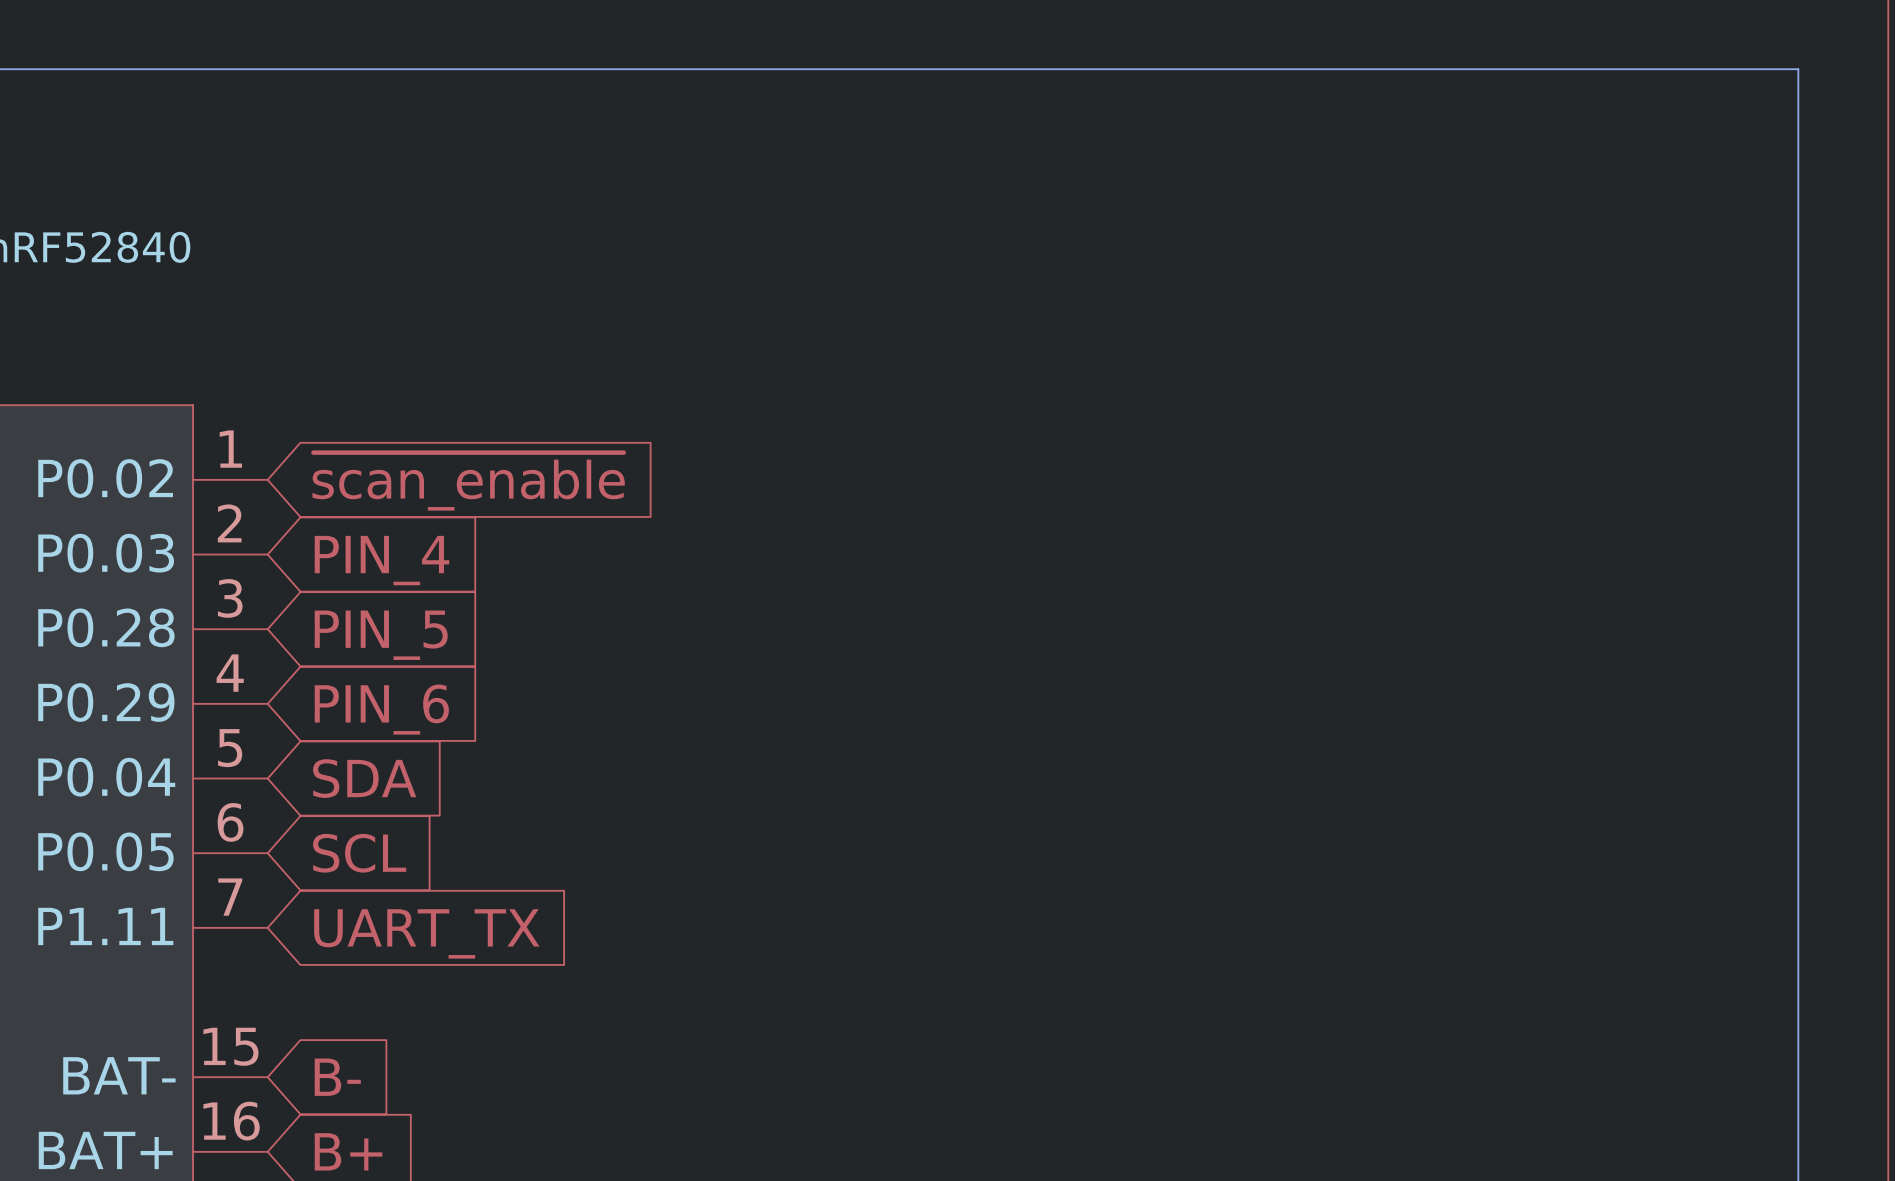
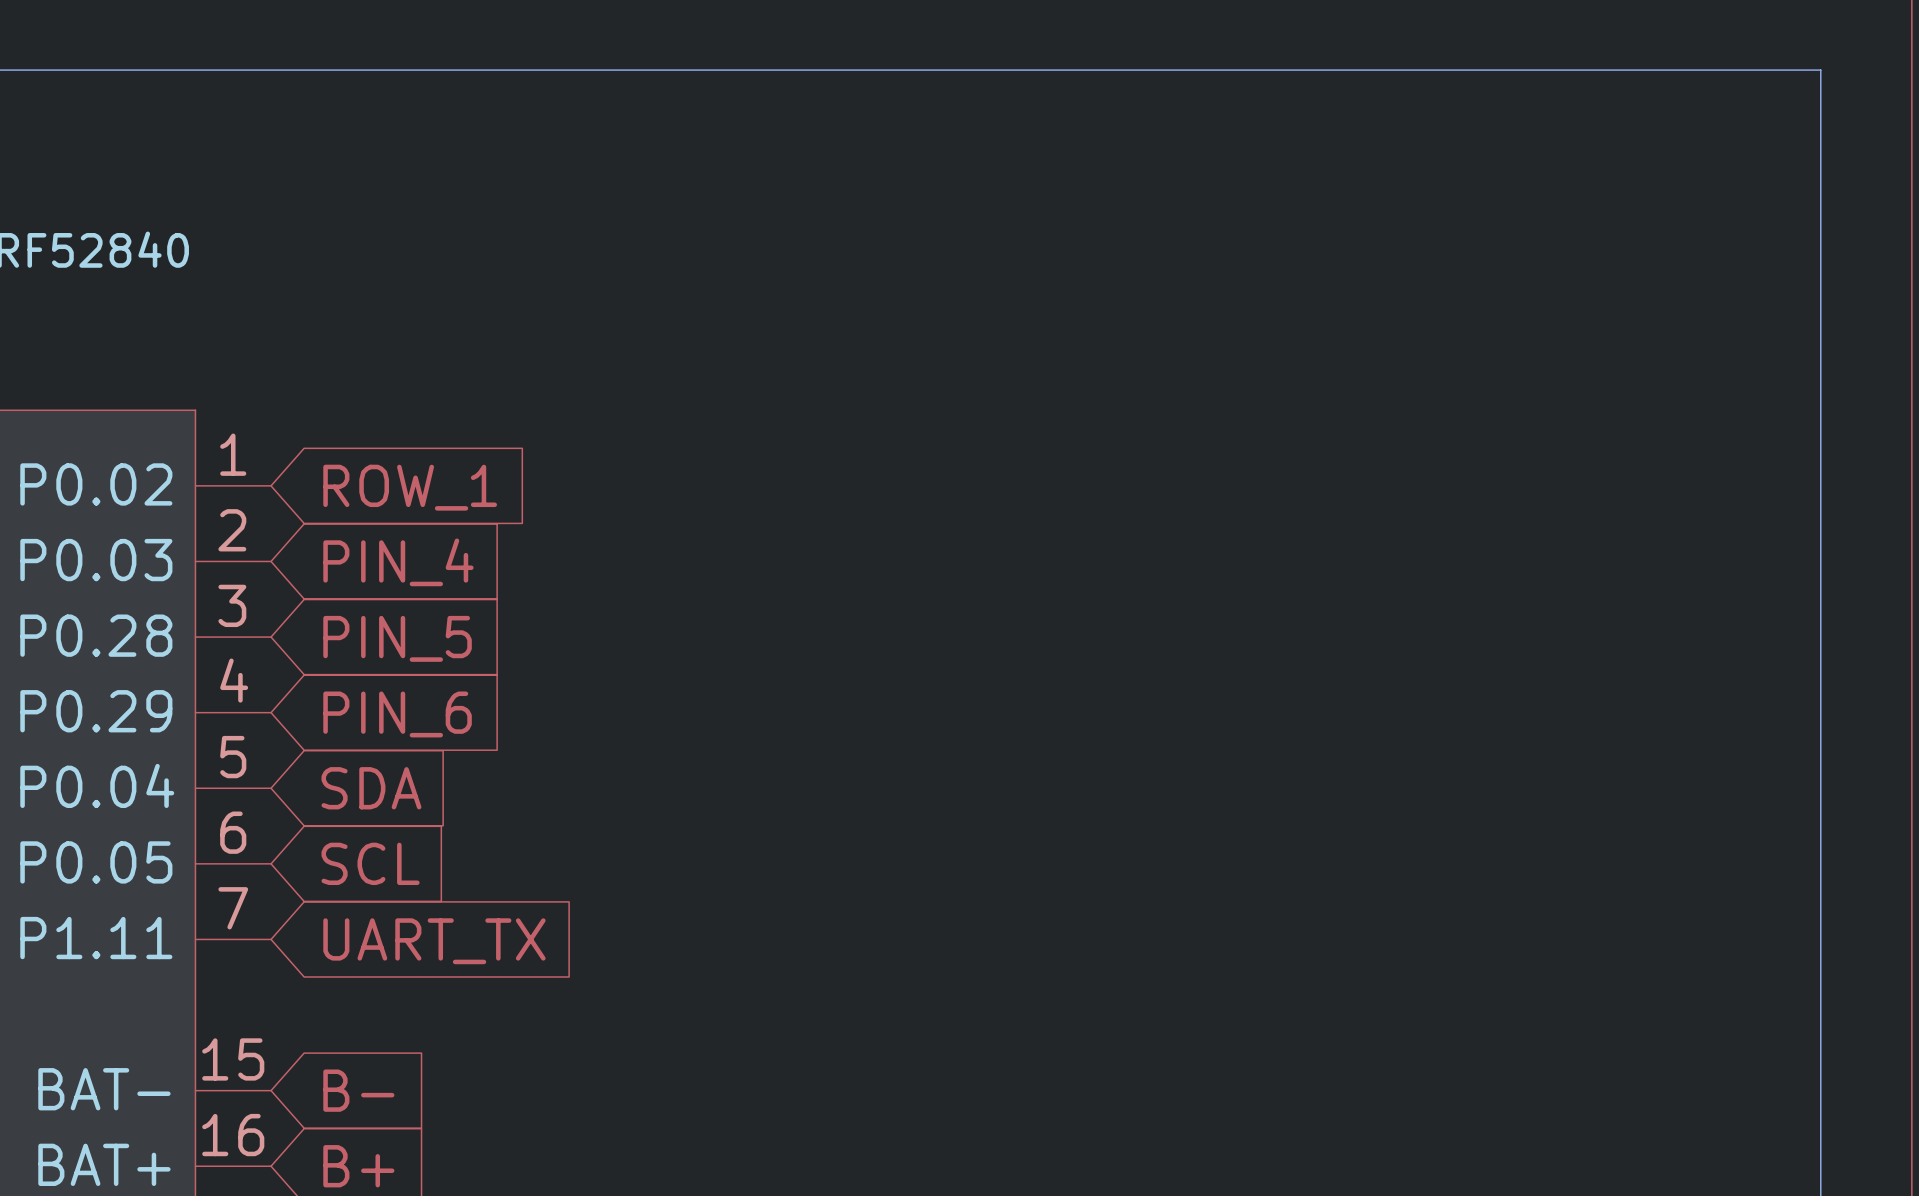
global label: ~{scan_enable} (468, 481) -> ROW_1 (410, 487)

